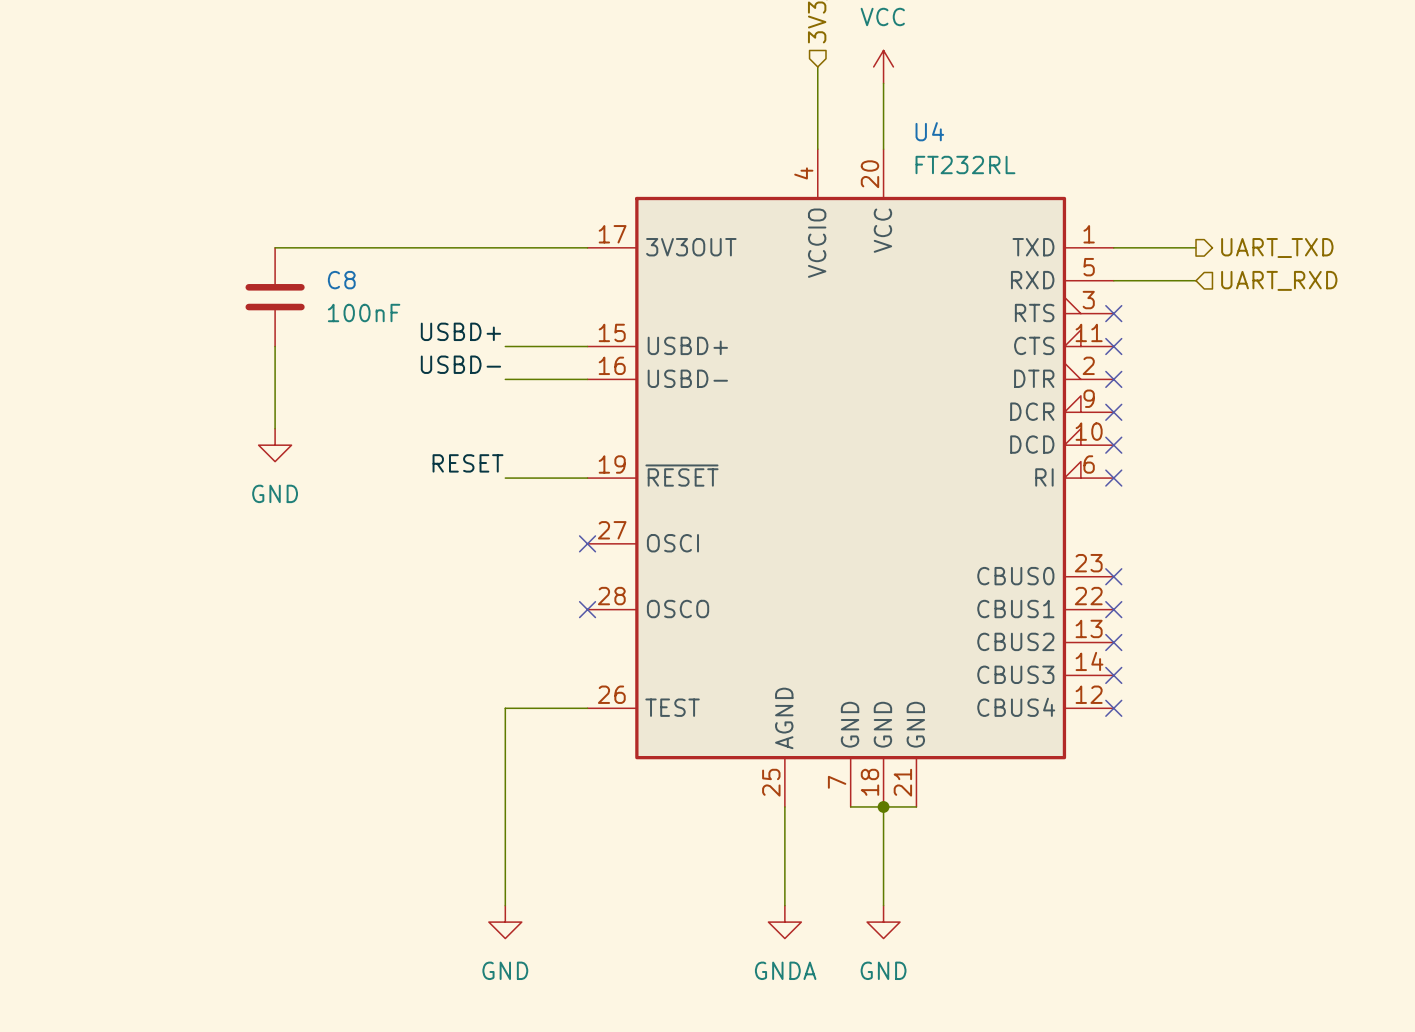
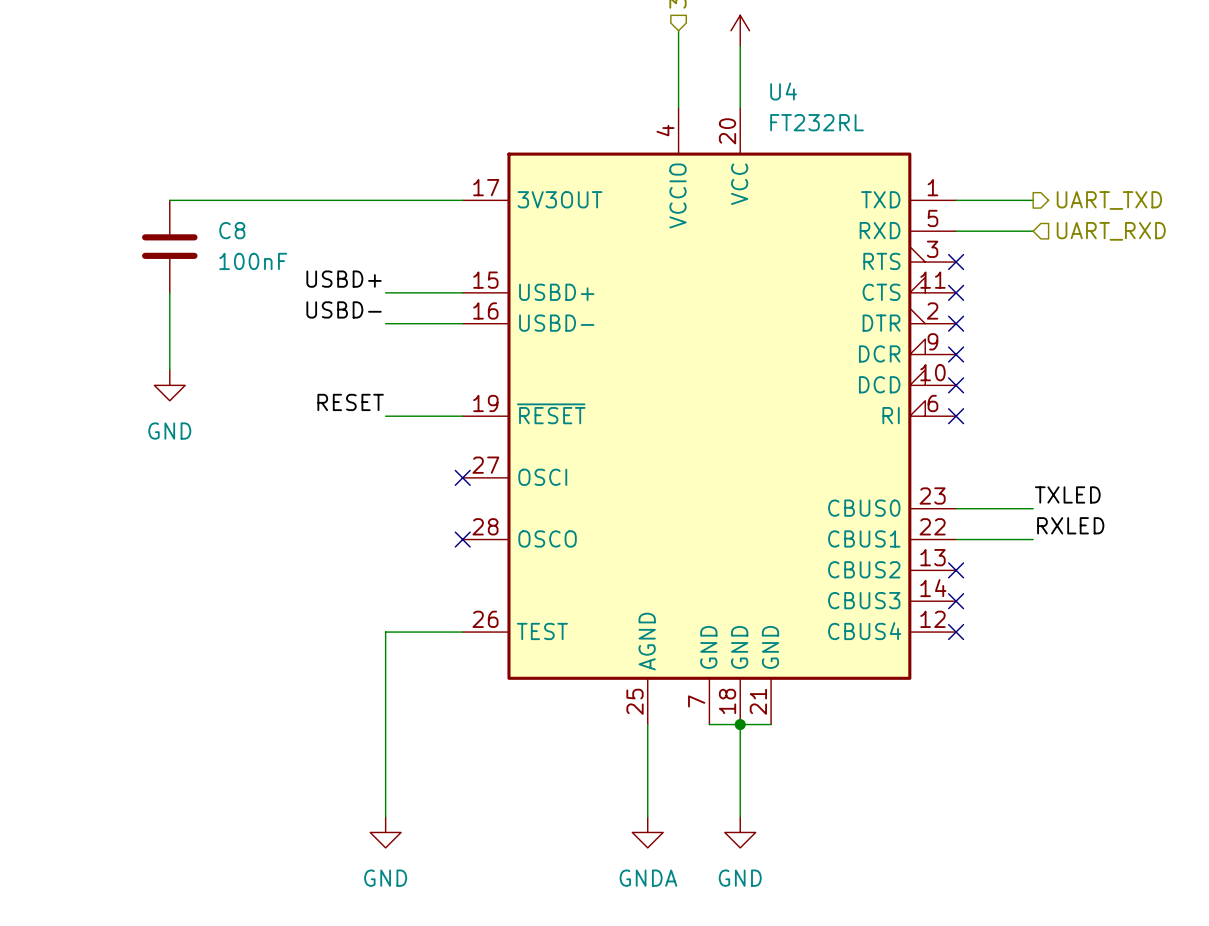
label: none -> TXLED (1067, 494)
wire: none -> (956, 508) (1033, 508)
no-connect mark: (1113, 576) -> none
label: none -> RXLED (1070, 525)
wire: none -> (956, 539) (1033, 539)
no-connect mark: (1113, 609) -> none

